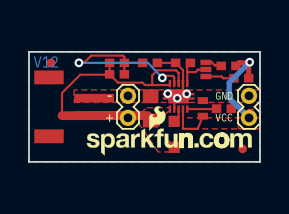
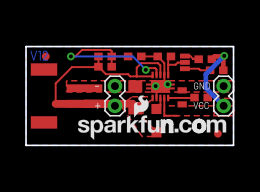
via: (167, 93) -> none
via: none -> (155, 86)
via: (177, 98) -> none
top track: (202, 116) (197, 128) -> none

